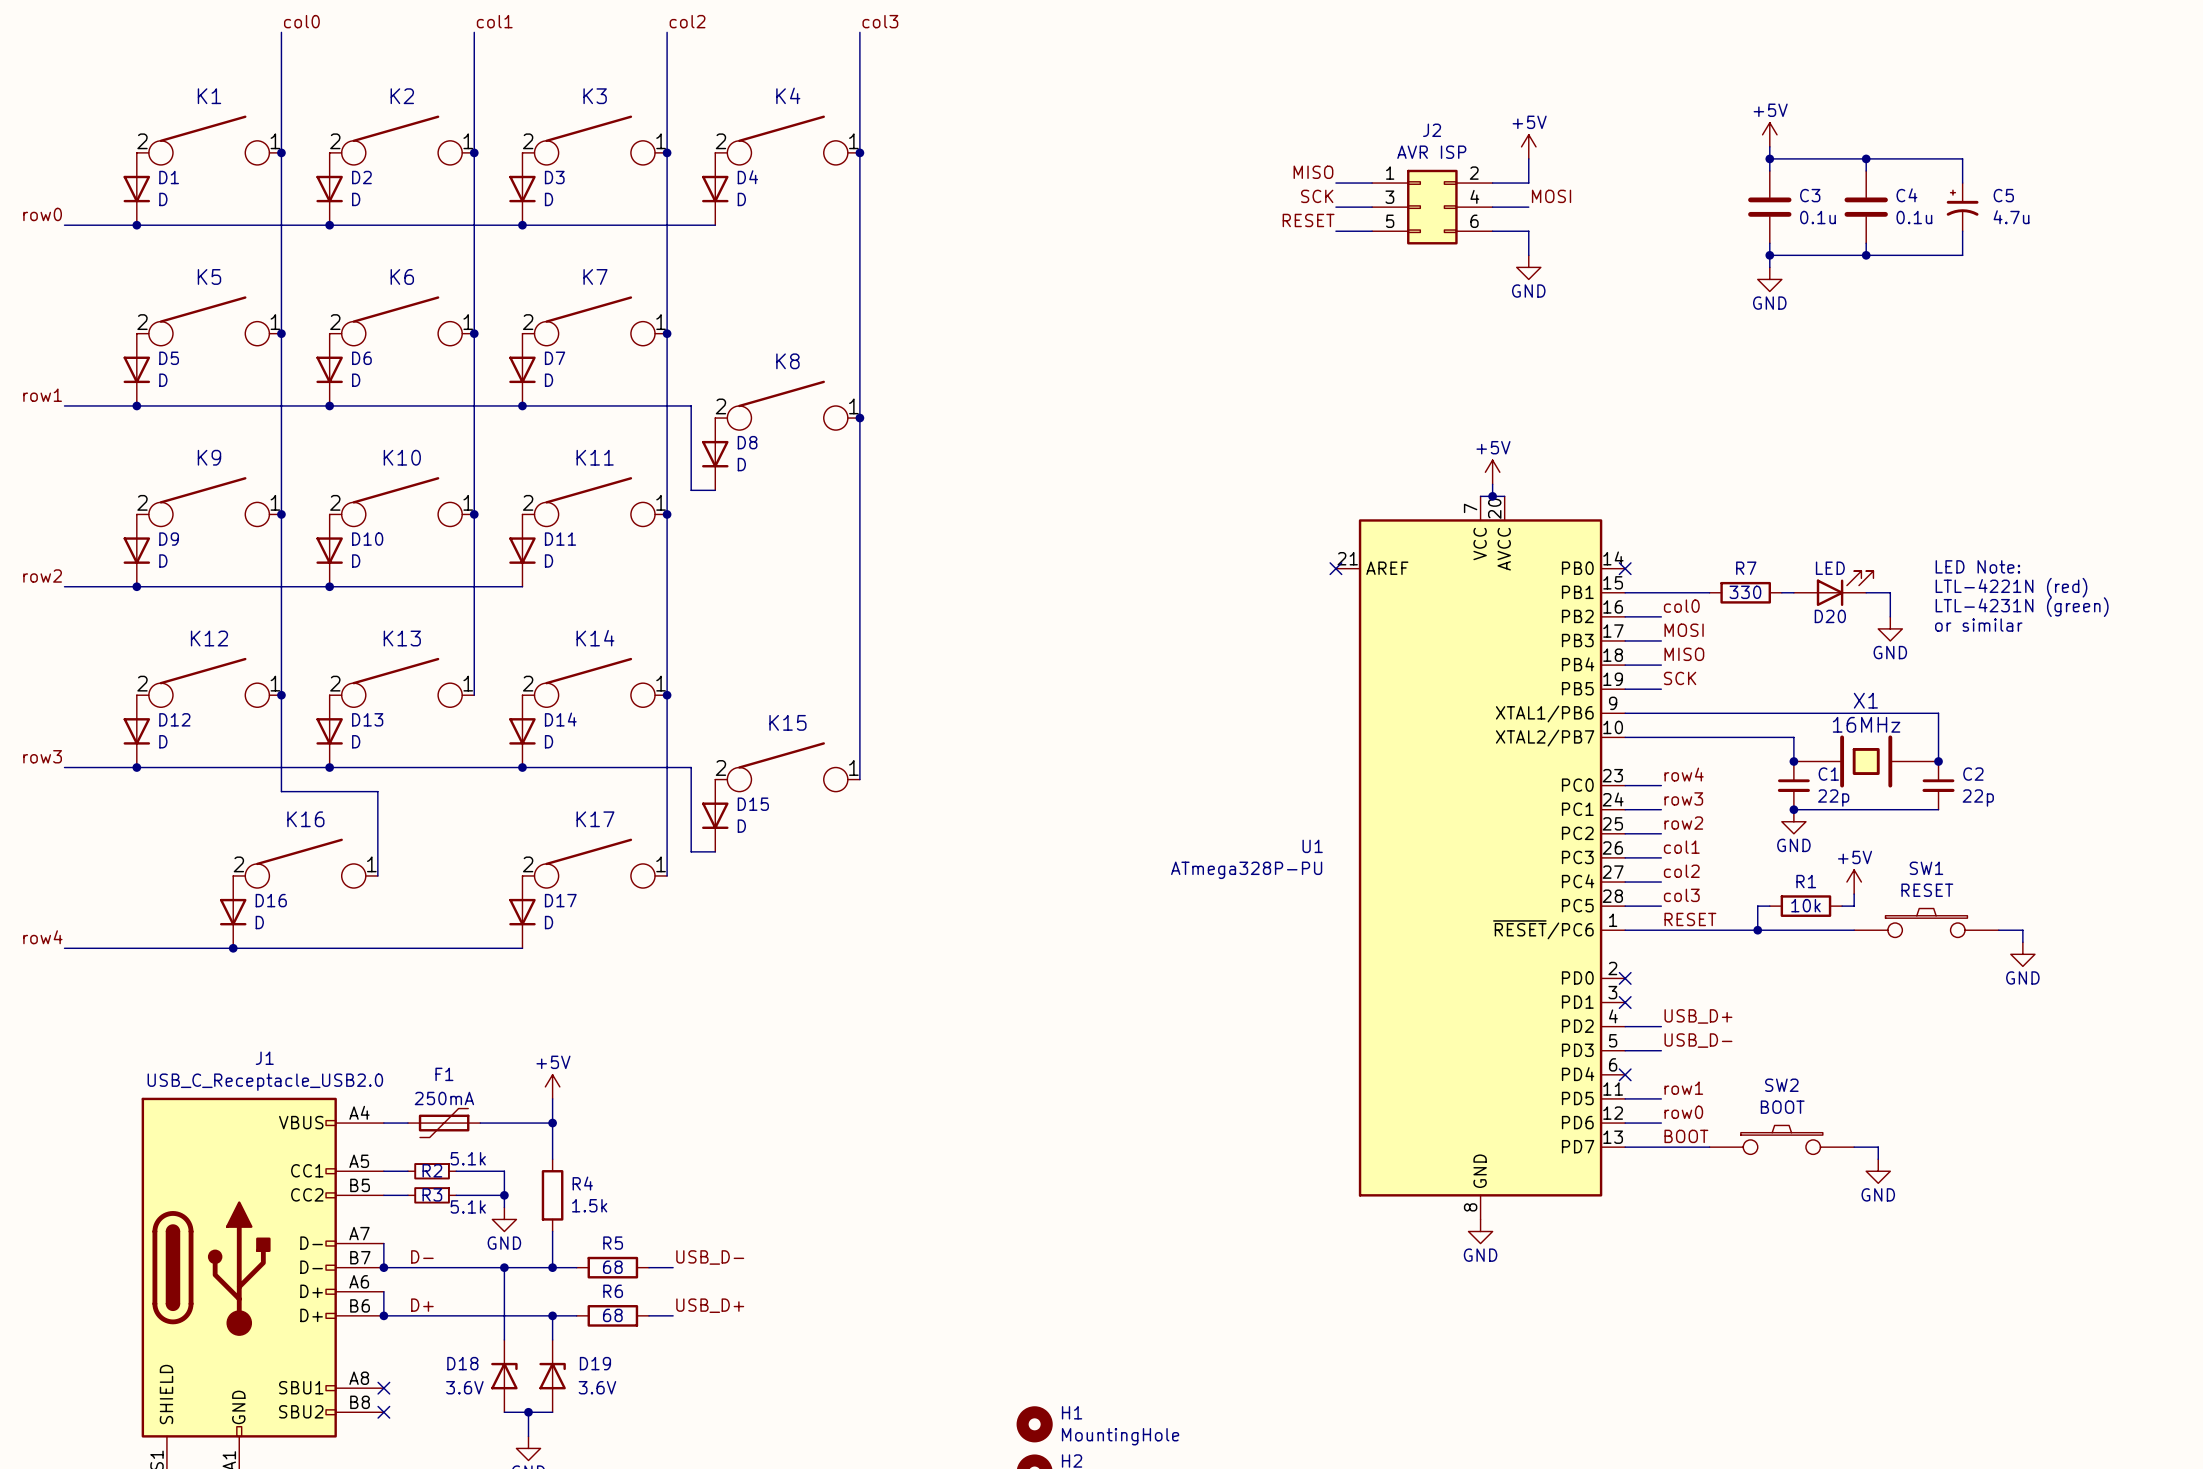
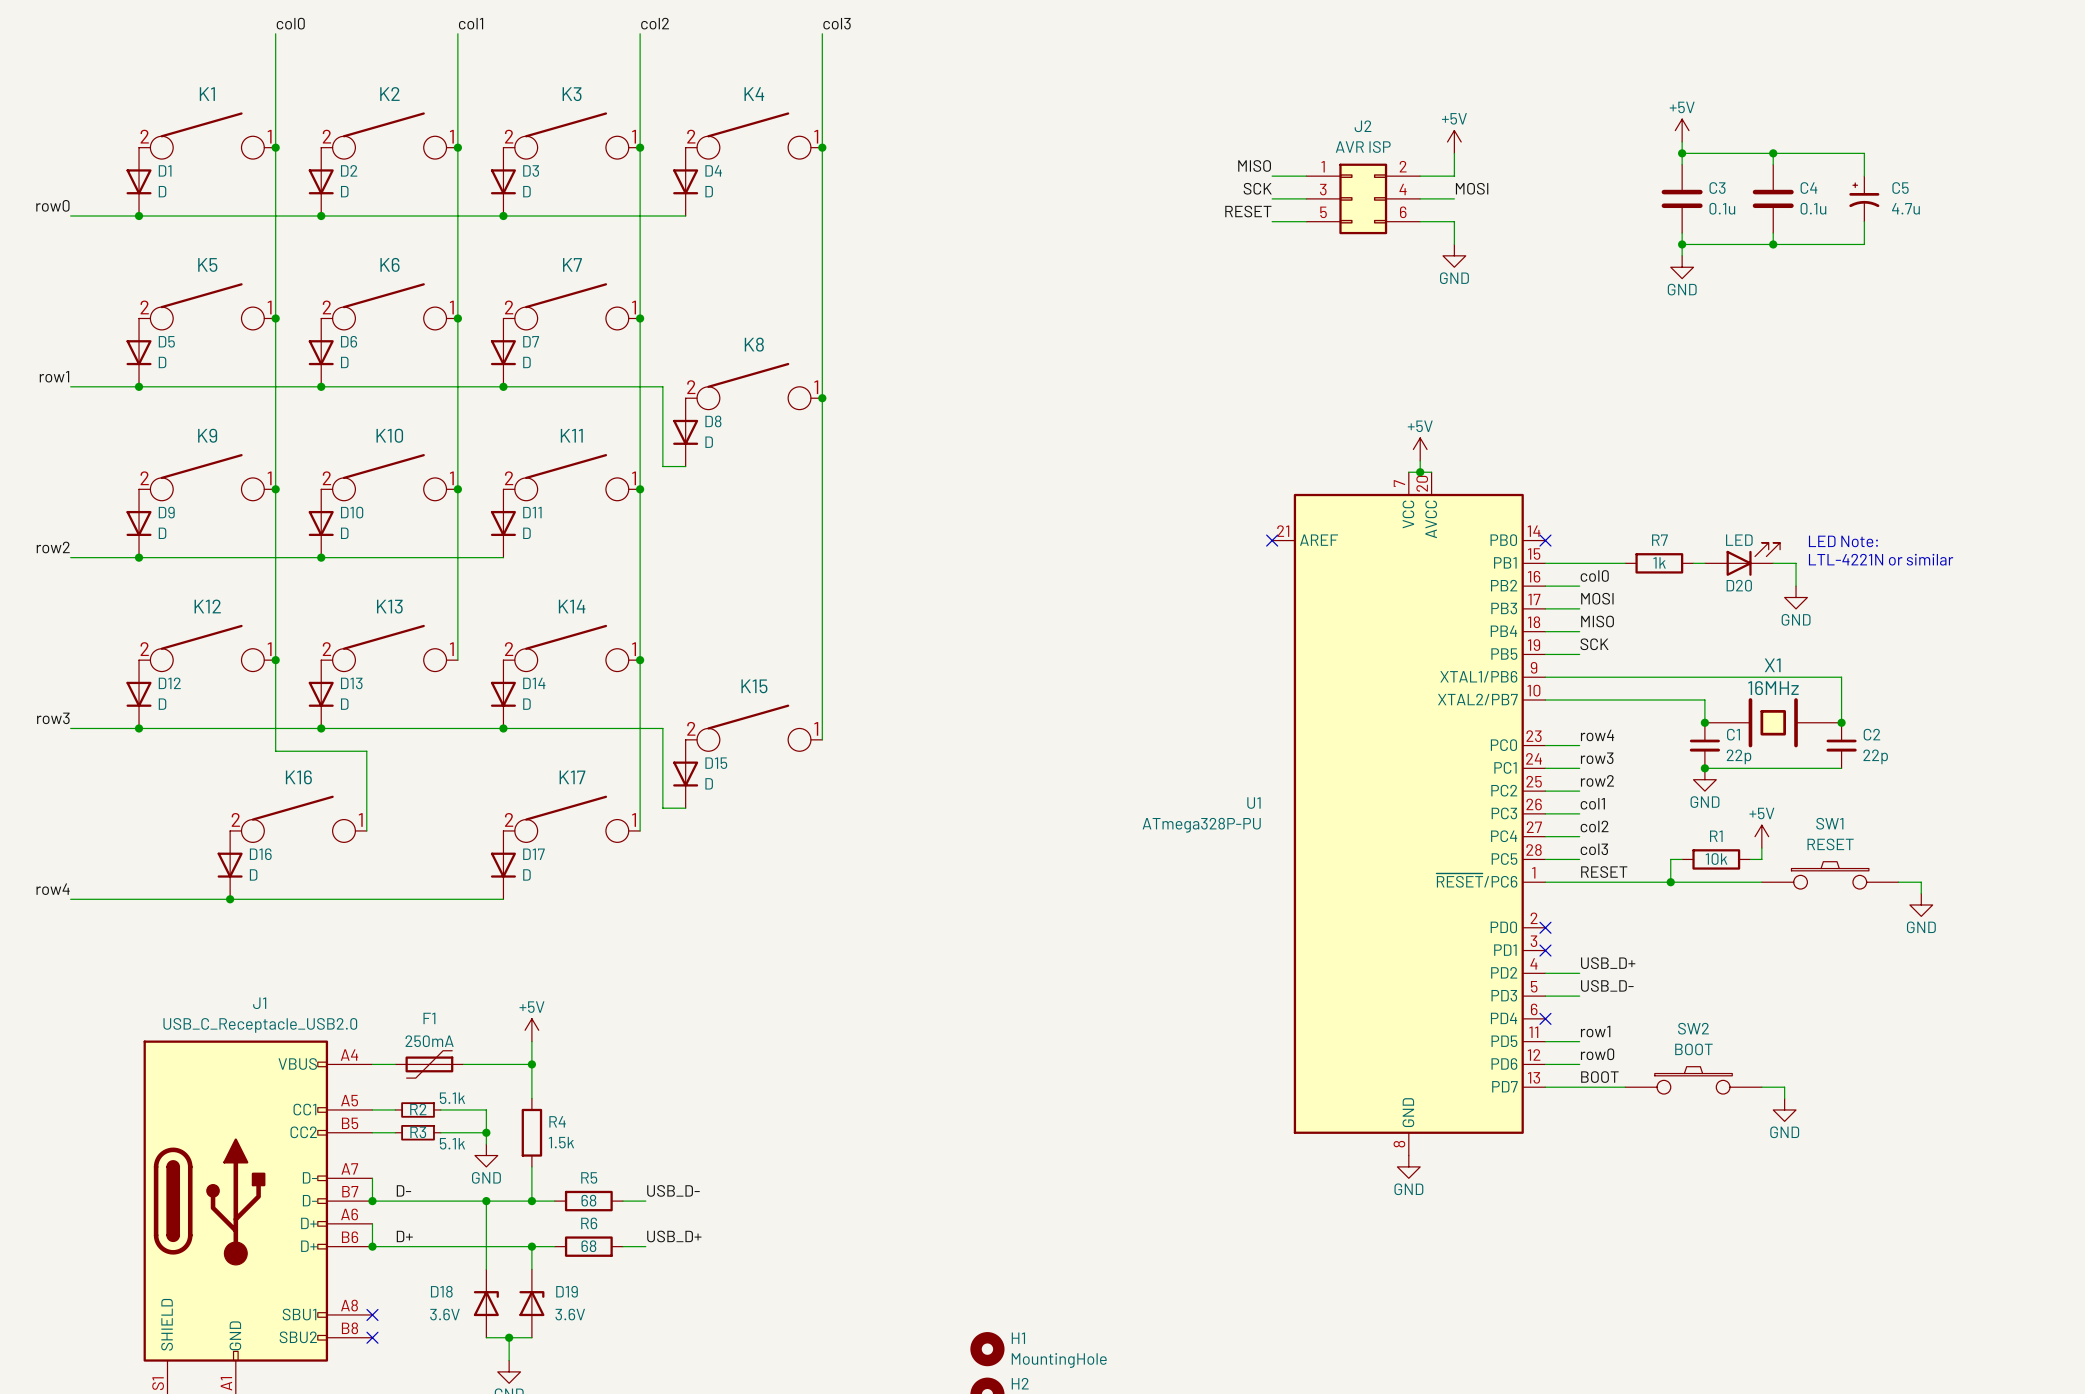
text position: LED Note: (1977, 566) -> LED Note: (1843, 541)
text: LTL-4221N (red) (2011, 587) -> LTL-4221N or similar (1881, 559)
R7 value: 330 (1745, 592) -> 1k (1659, 562)
text: LTL-4231N (green) (2022, 607) -> none
text: or similar (1978, 625) -> none

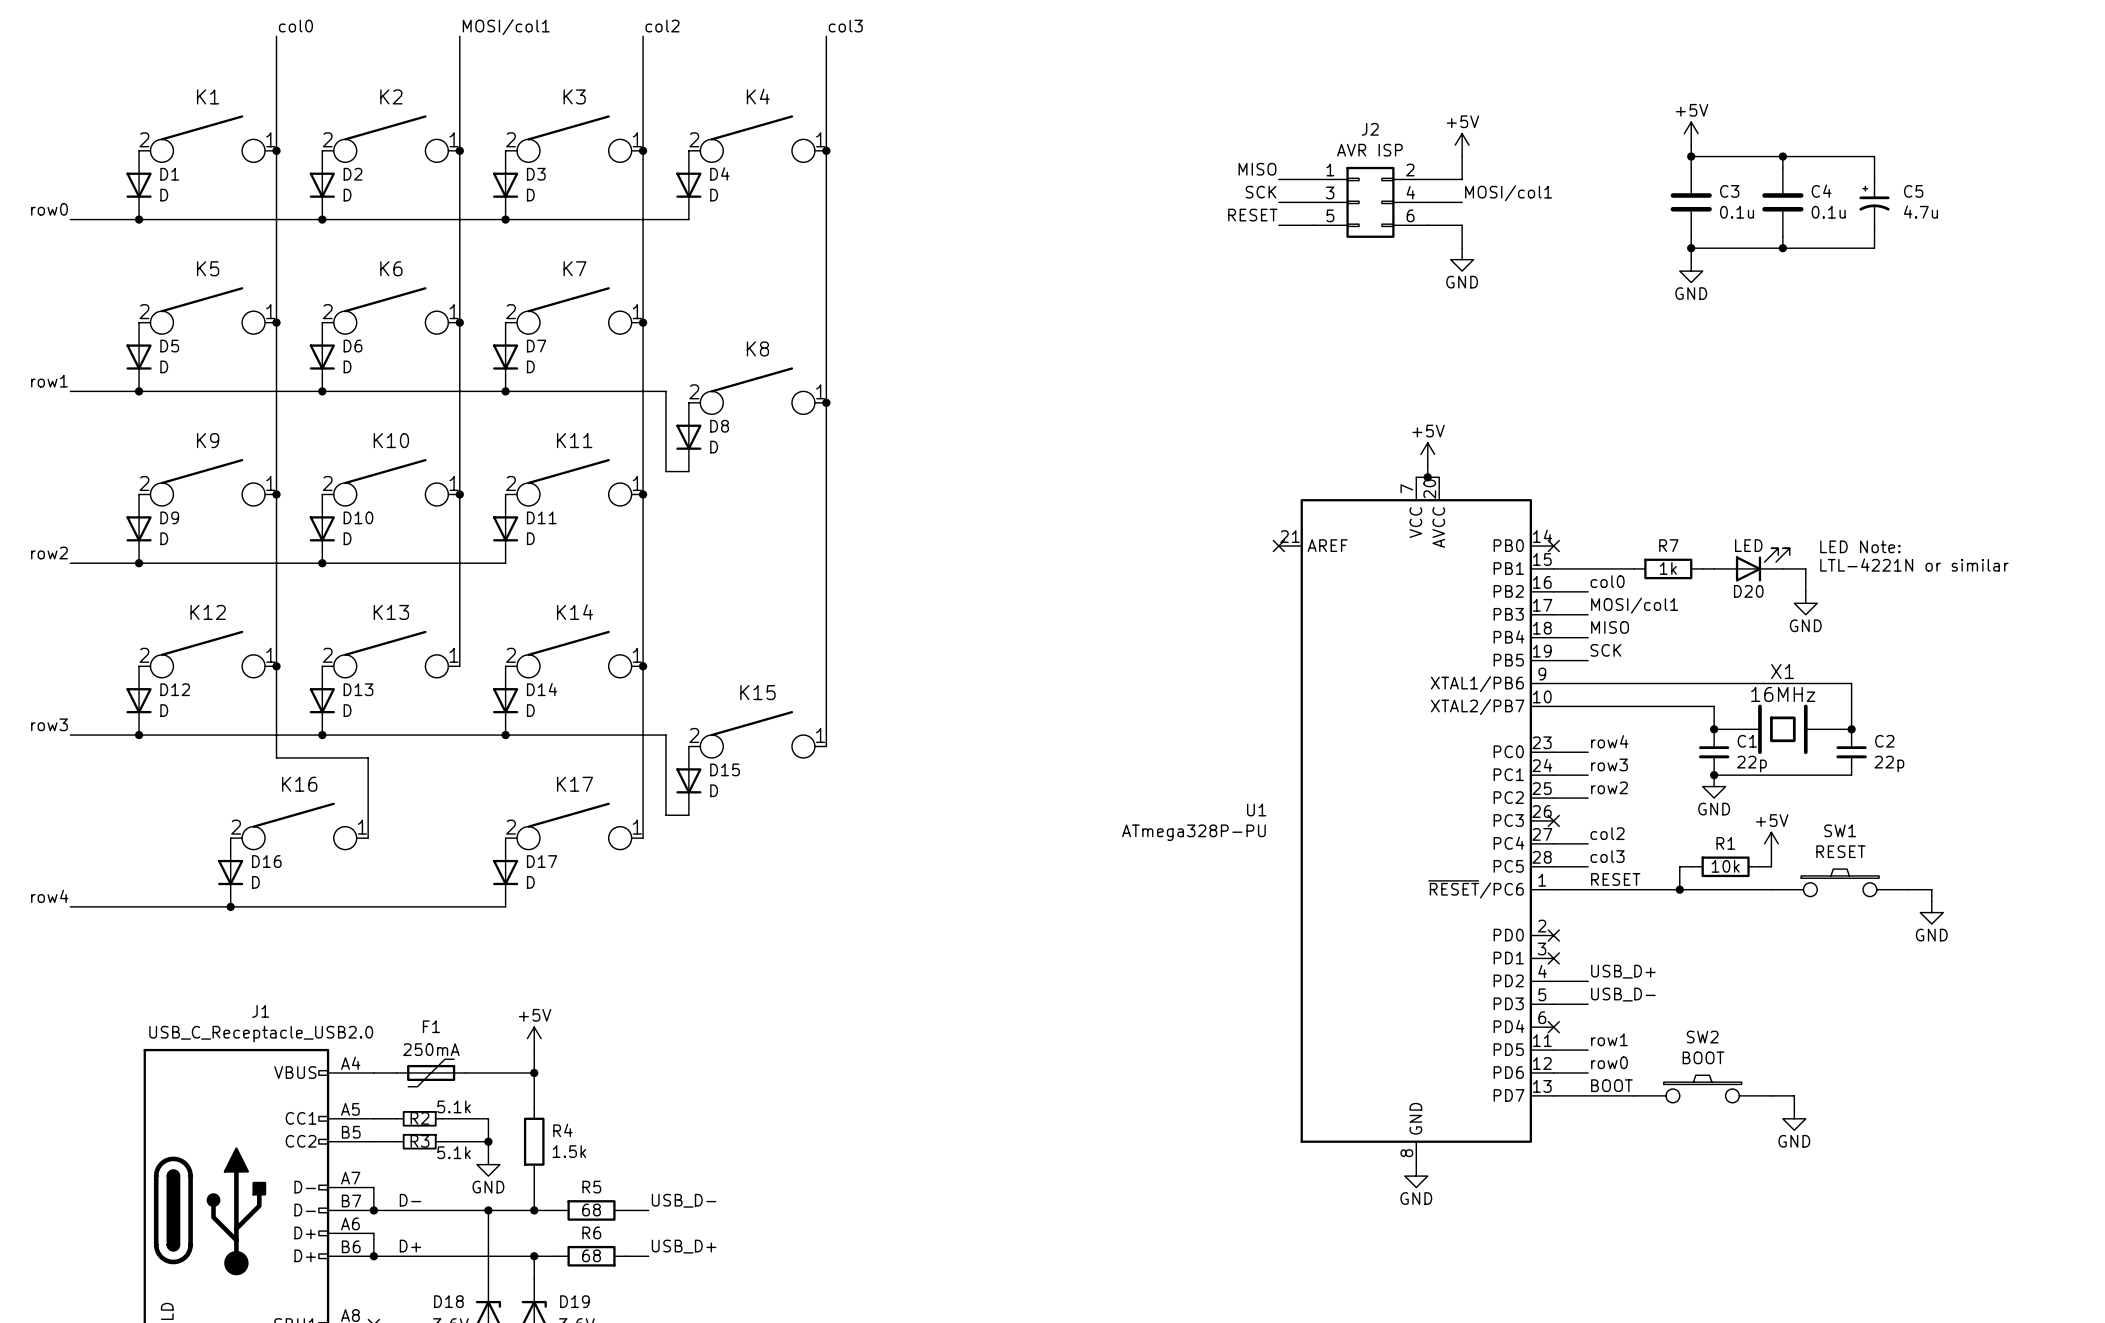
label: col1 (471, 23) -> MOSI/col1 (506, 27)
label: MOSI (1472, 188) -> MOSI/col1 (1508, 193)
label: MOSI (1597, 598) -> MOSI/col1 (1634, 605)
label: col1 (1592, 803) -> none
wire: (1545, 813) (1579, 813) -> none
no-connect mark: none -> (1553, 820)

